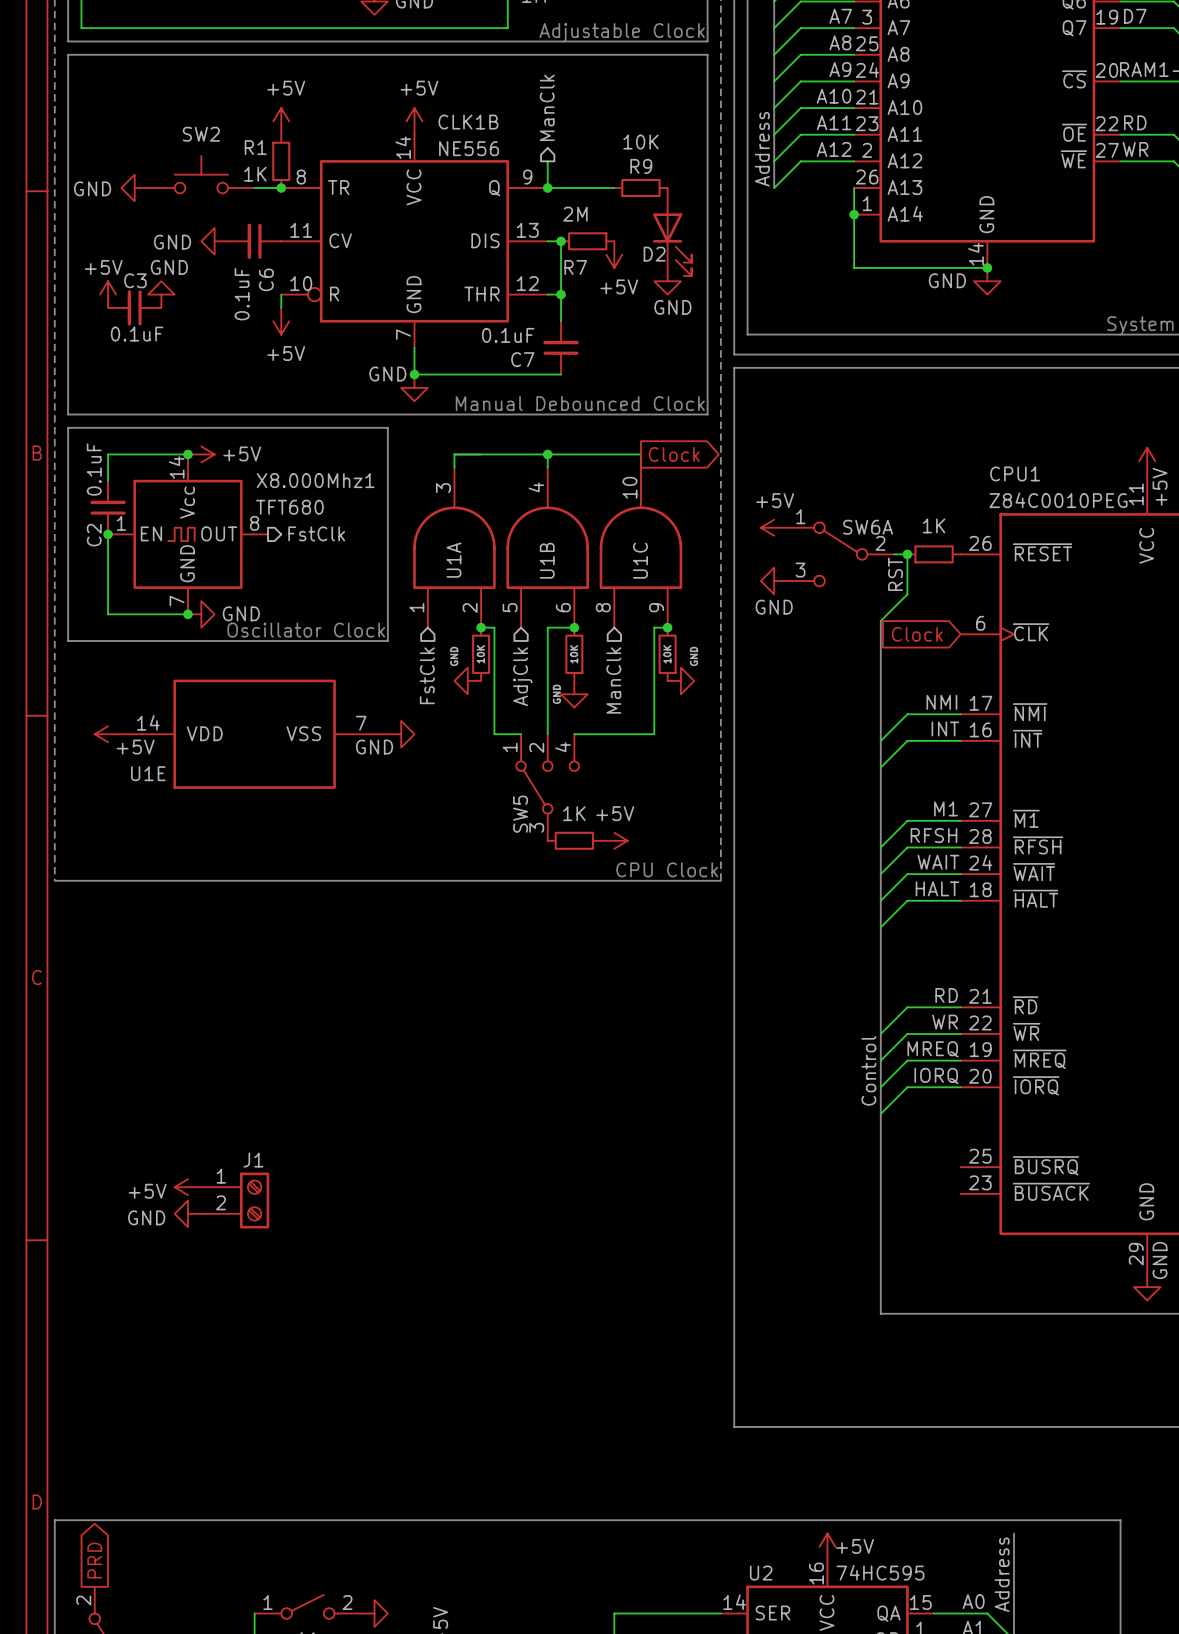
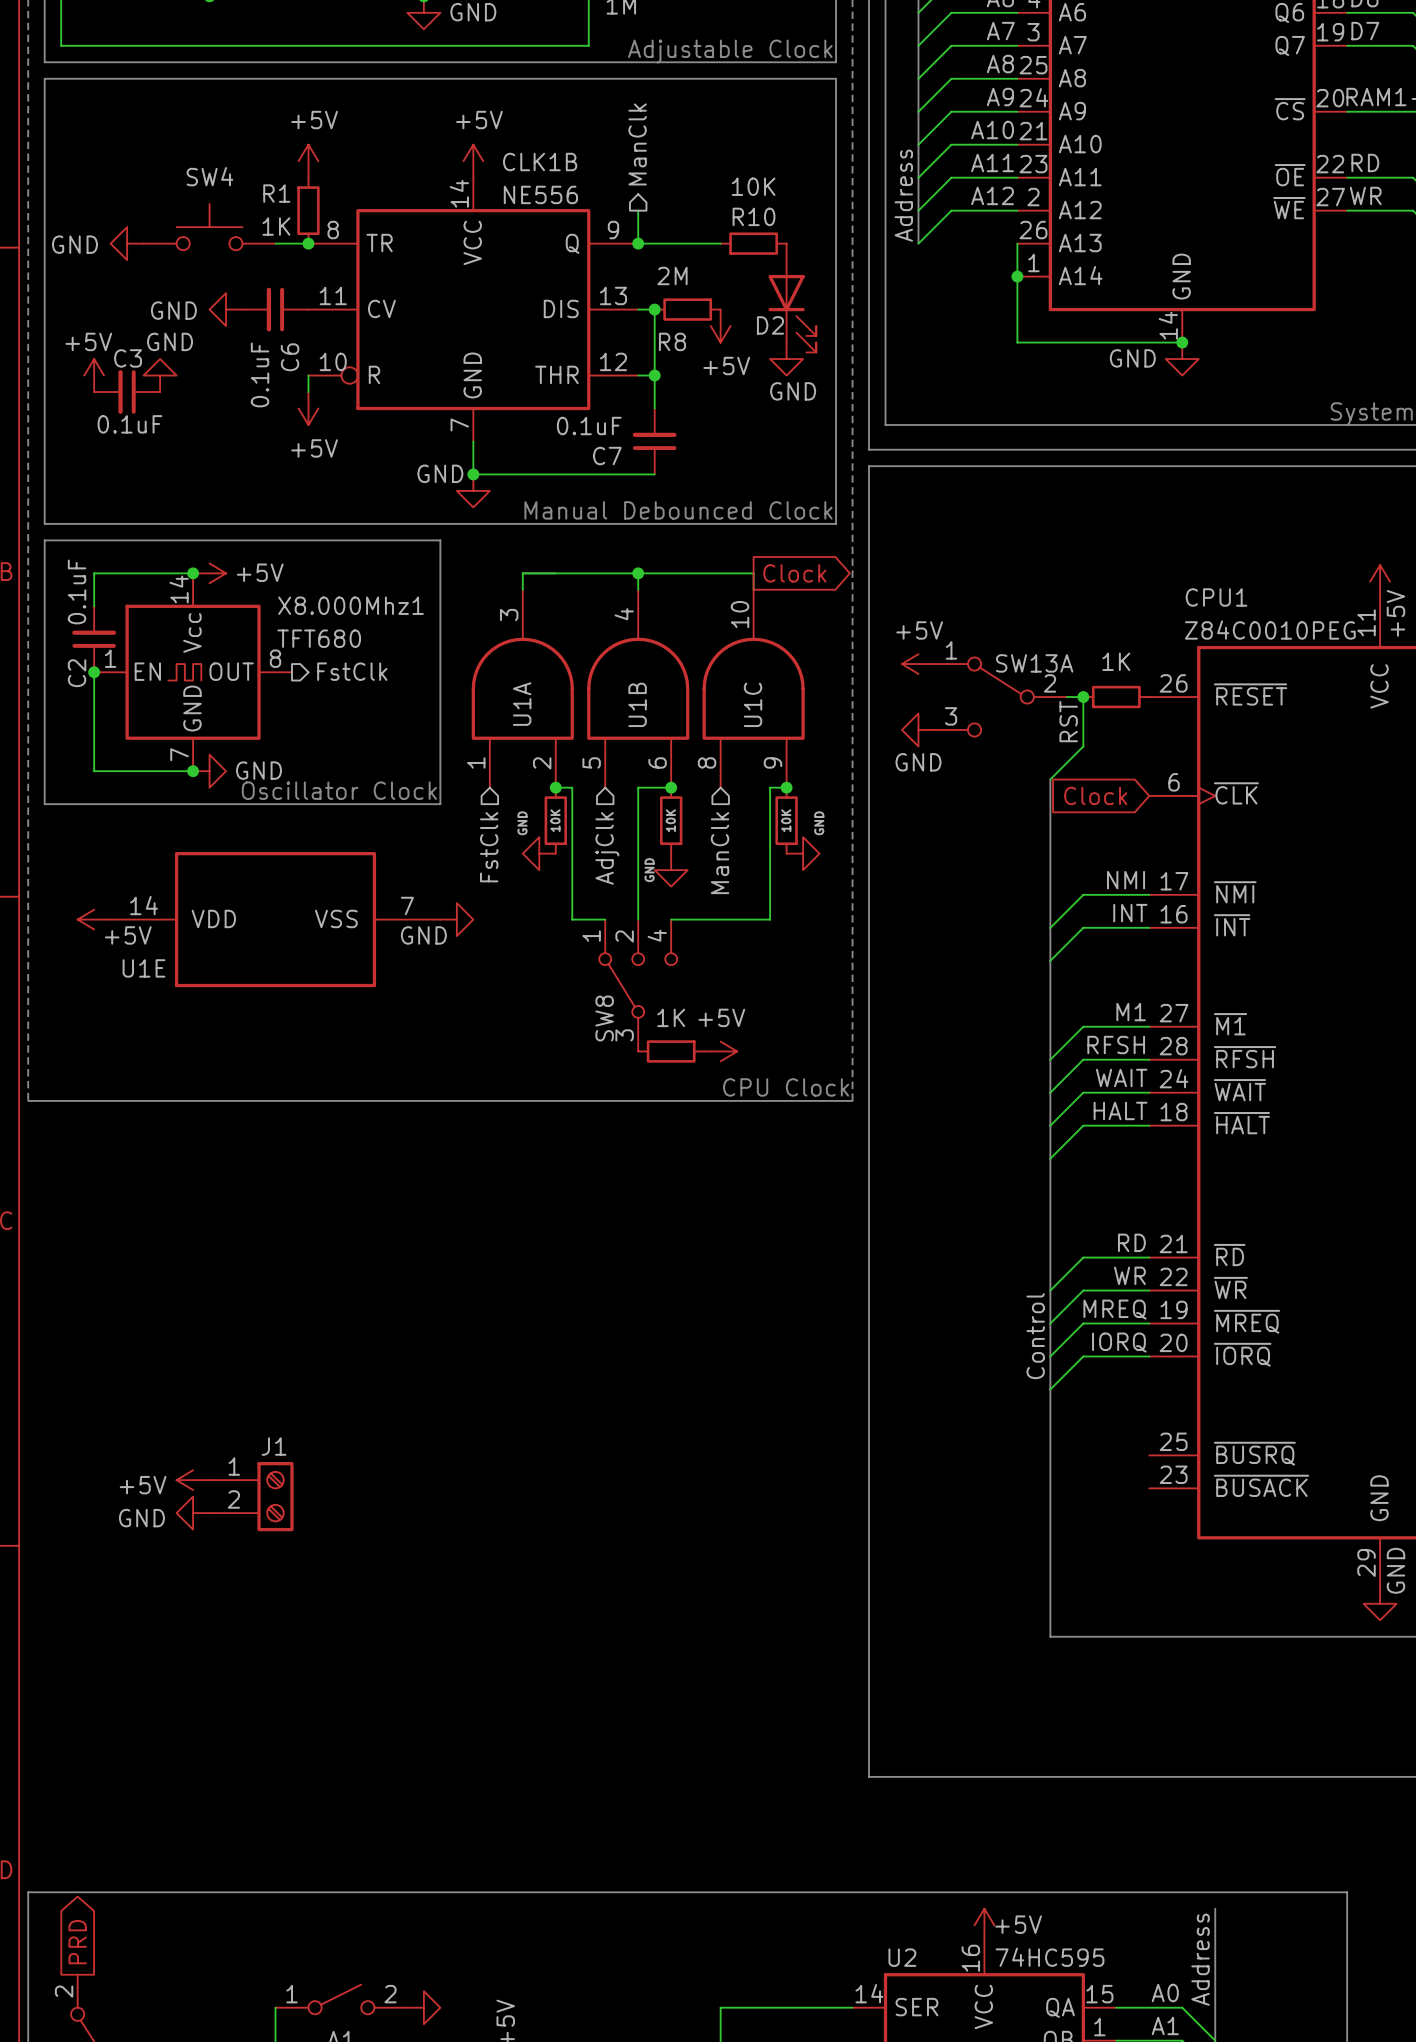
SW2 name: SW2 (201, 134) -> SW4 (209, 176)
R9 name: R9 (641, 166) -> R10 (754, 216)
R7 name: R7 (575, 267) -> R8 (672, 341)
SW6A name: SW6A (868, 527) -> SW13A (1034, 663)
SW5 name: SW5 (520, 814) -> SW8 (604, 1018)

